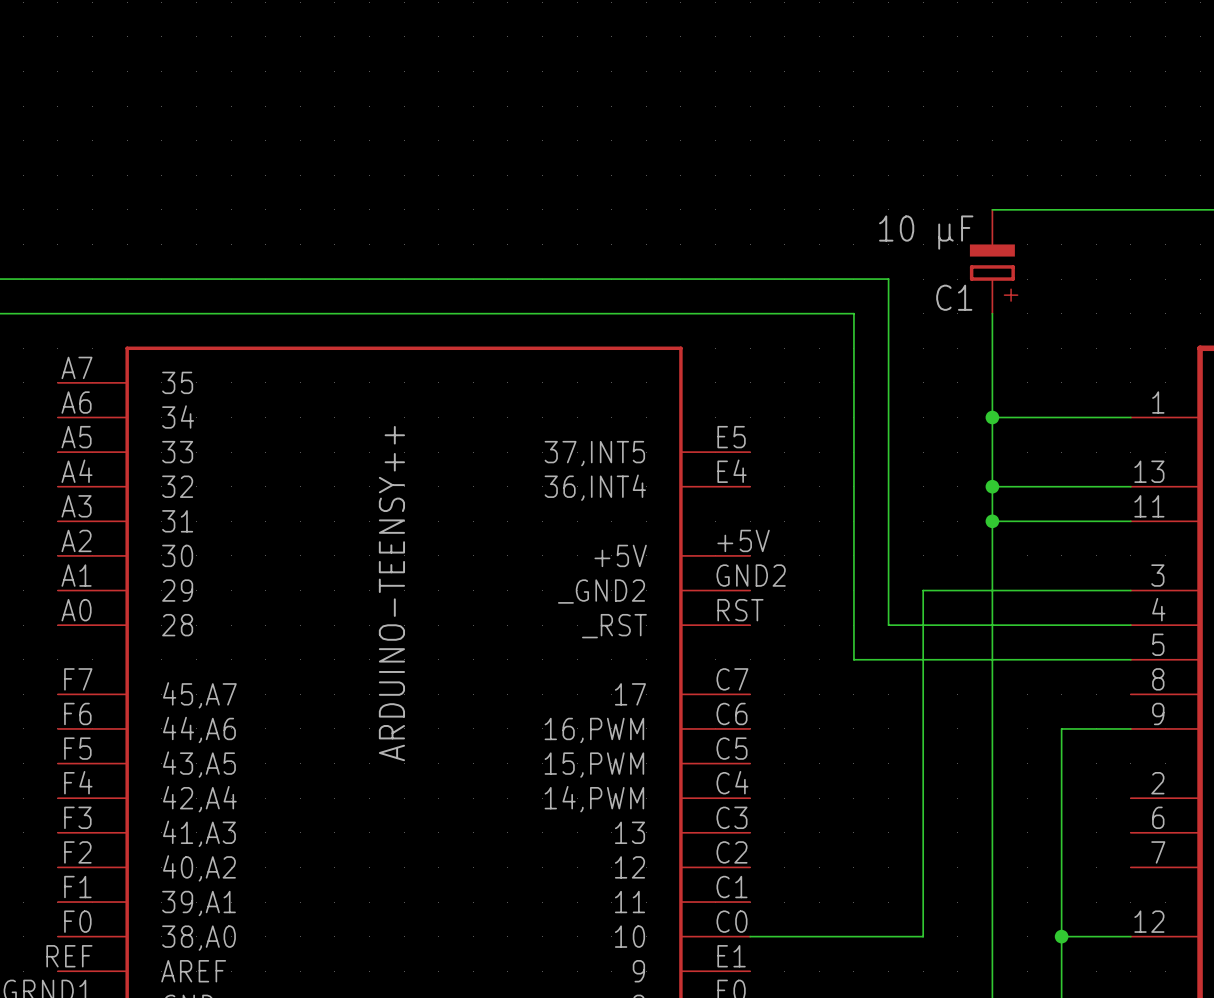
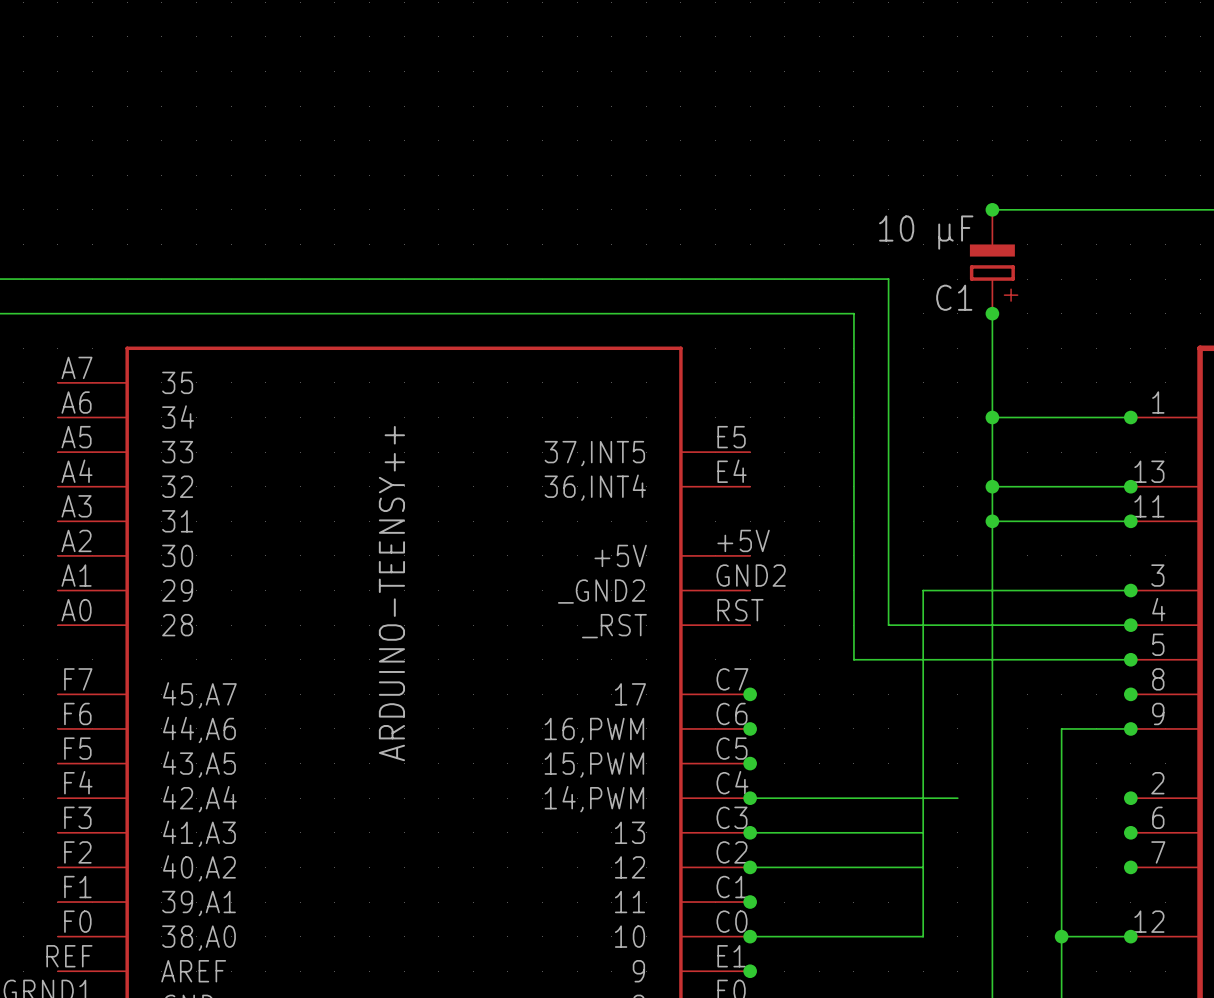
junction: none -> (992, 209)
junction: none -> (992, 313)
junction: none -> (1130, 417)
junction: none -> (1130, 486)
junction: none -> (1130, 521)
junction: none -> (1130, 590)
junction: none -> (1130, 625)
junction: none -> (1130, 659)
junction: none -> (750, 694)
junction: none -> (1130, 694)
junction: none -> (750, 728)
junction: none -> (1130, 728)
junction: none -> (750, 763)
wire: none -> (750, 798) (957, 798)
junction: none -> (750, 798)
junction: none -> (1130, 798)
wire: none -> (750, 832) (923, 832)
junction: none -> (750, 832)
junction: none -> (1130, 832)
wire: none -> (750, 867) (923, 867)
junction: none -> (750, 867)
junction: none -> (1130, 867)
junction: none -> (750, 902)
junction: none -> (750, 936)
junction: none -> (1130, 936)
junction: none -> (750, 971)

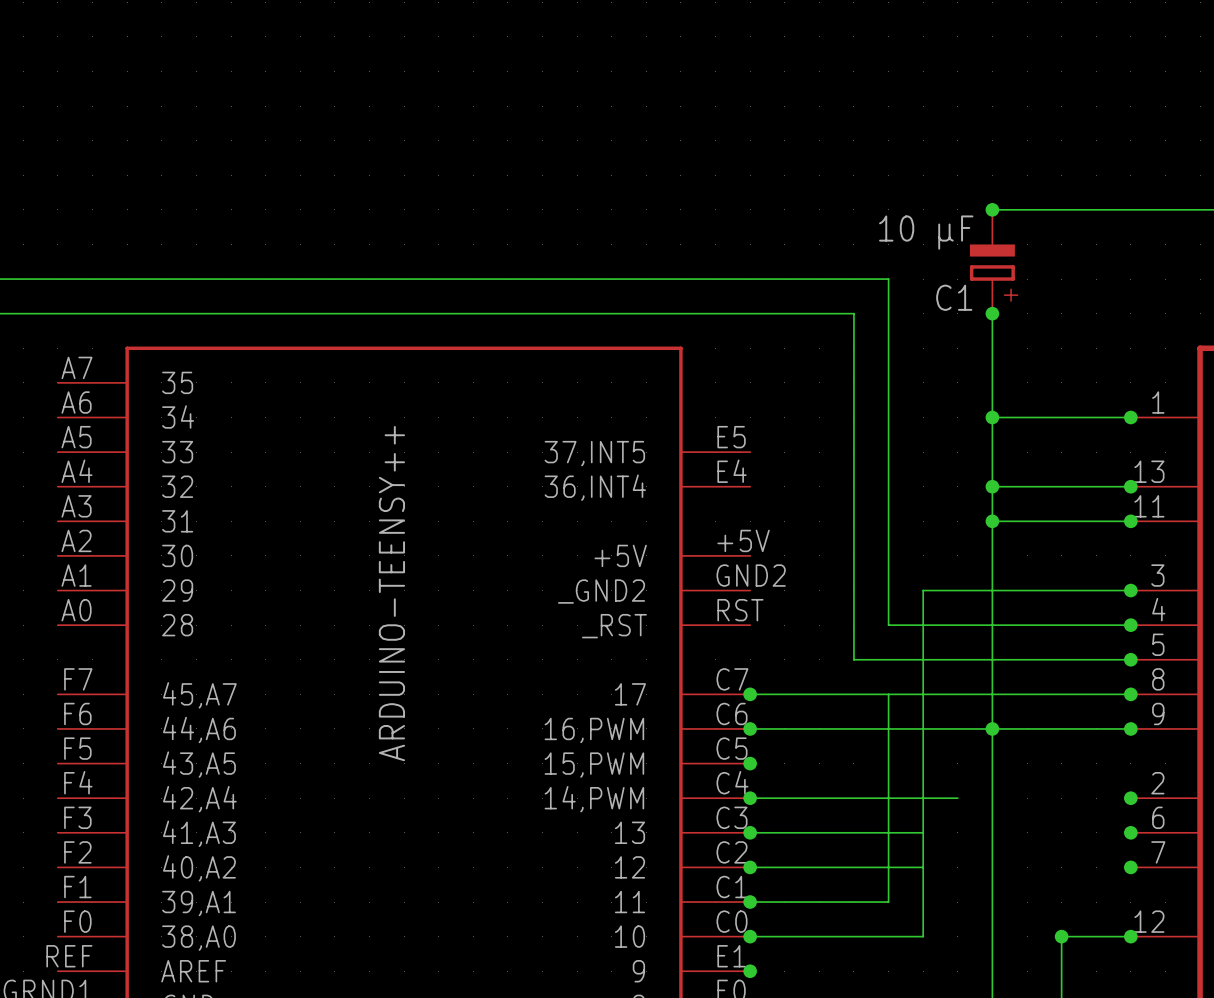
wire: none -> (750, 694) (1130, 694)
wire: none -> (888, 694) (888, 902) (750, 902)
junction: none -> (992, 728)
wire: (1061, 728) (1061, 936) -> (1061, 728) (750, 728)

